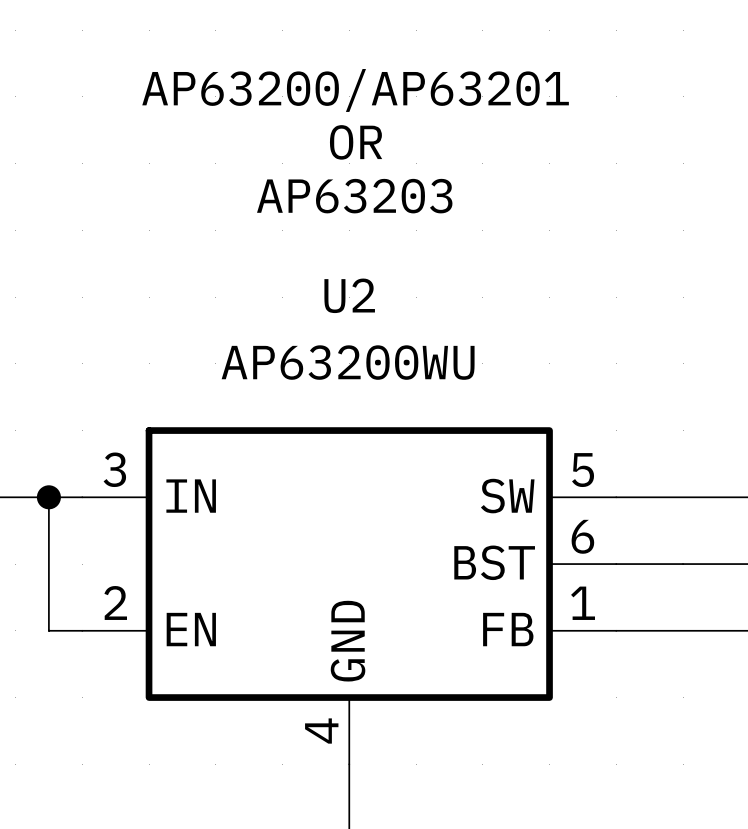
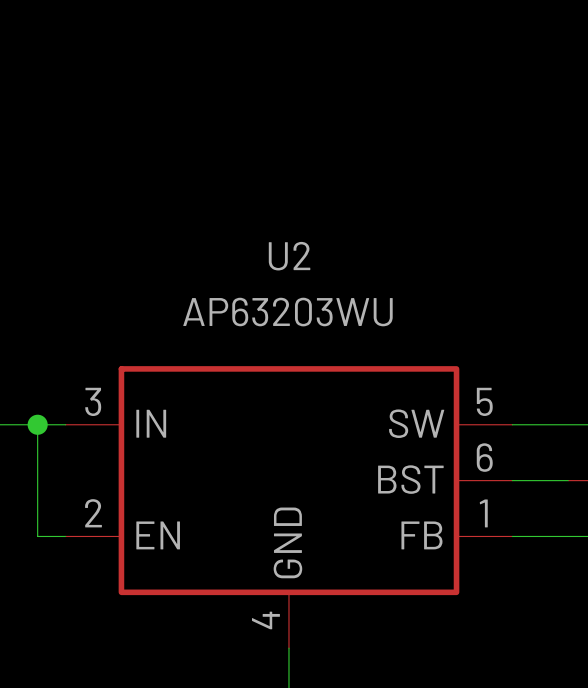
text: AP63200/AP63201 (355, 90) -> none
text: OR (356, 142) -> none
text: AP63203 (354, 196) -> none
U2 value: AP63200WU (348, 362) -> AP63203WU (287, 312)

